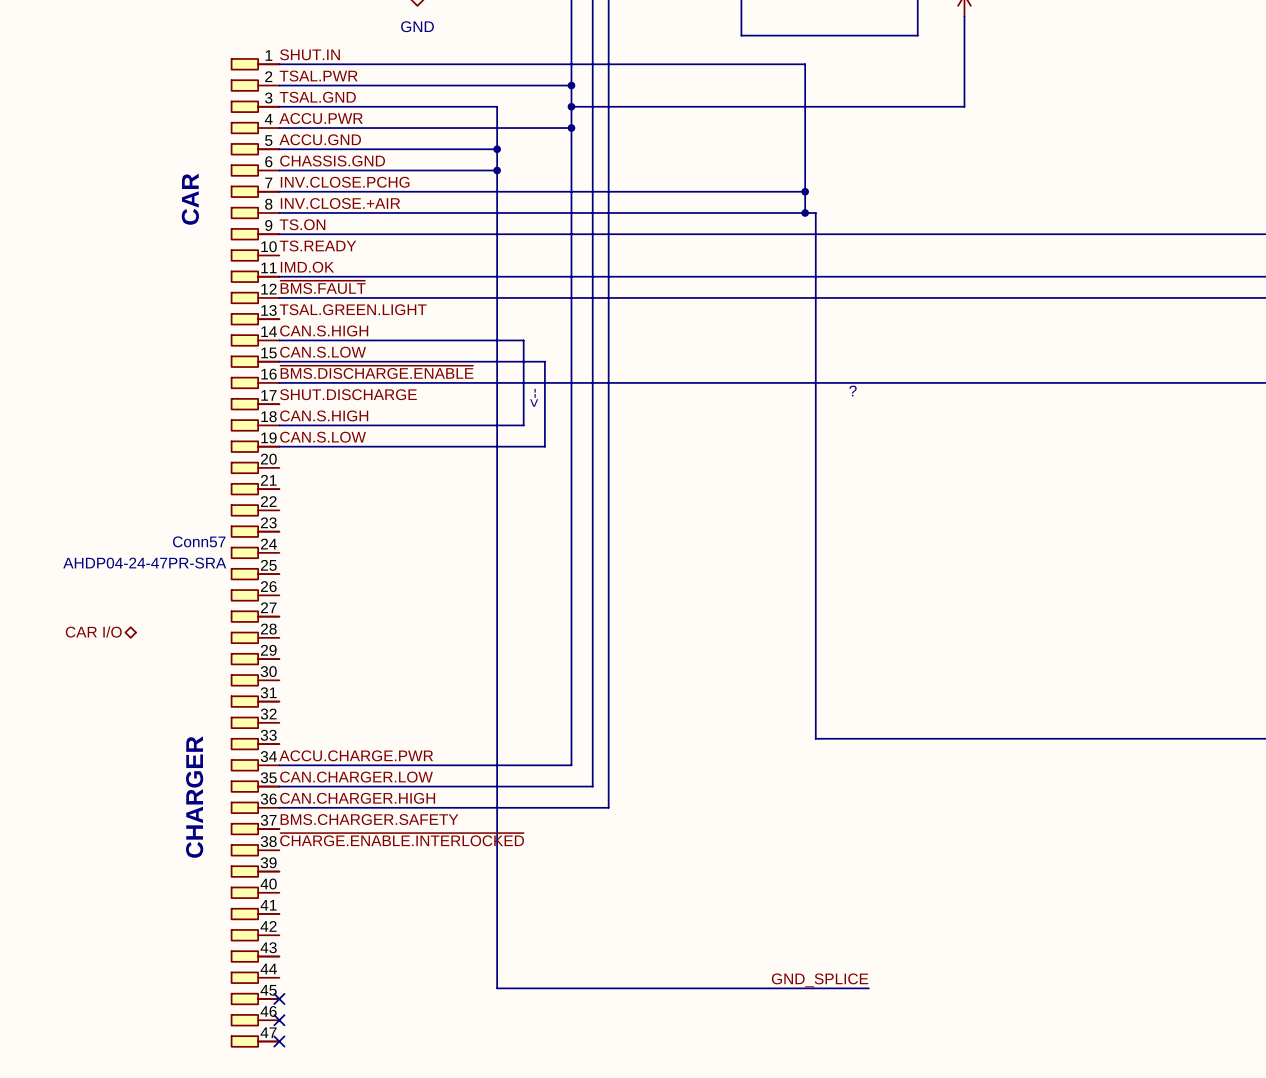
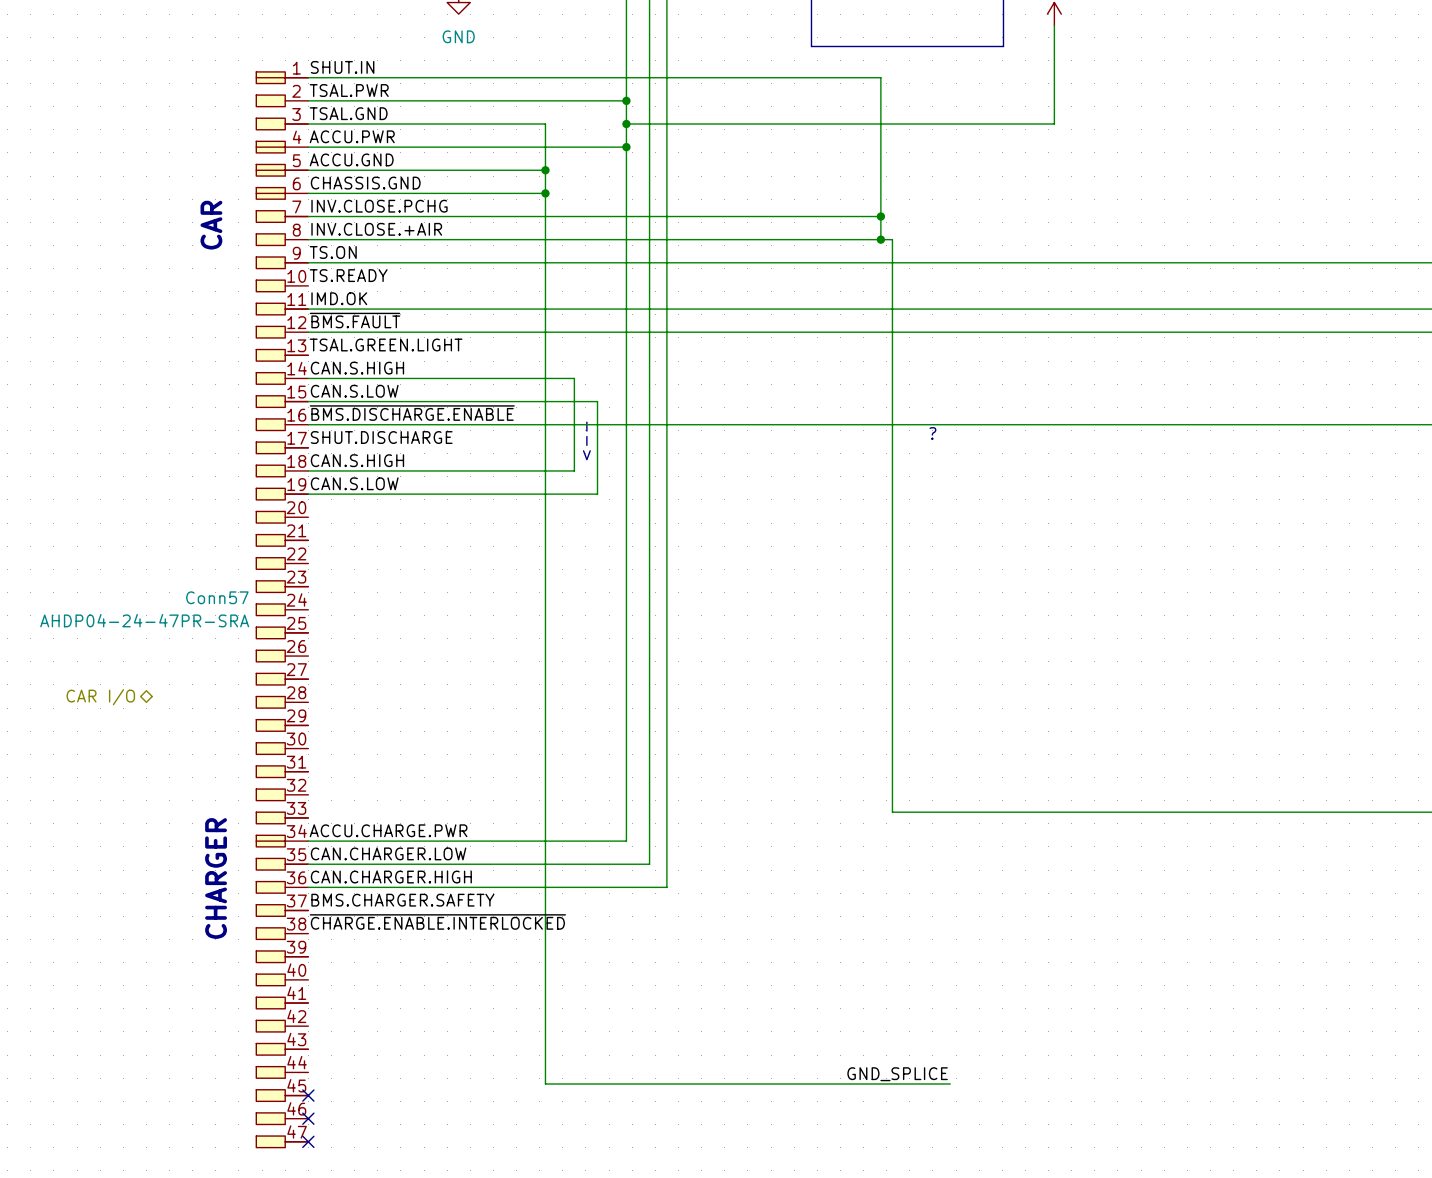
Conn57 symbol: [231, 58, 280, 1047] -> [256, 71, 309, 1148]

